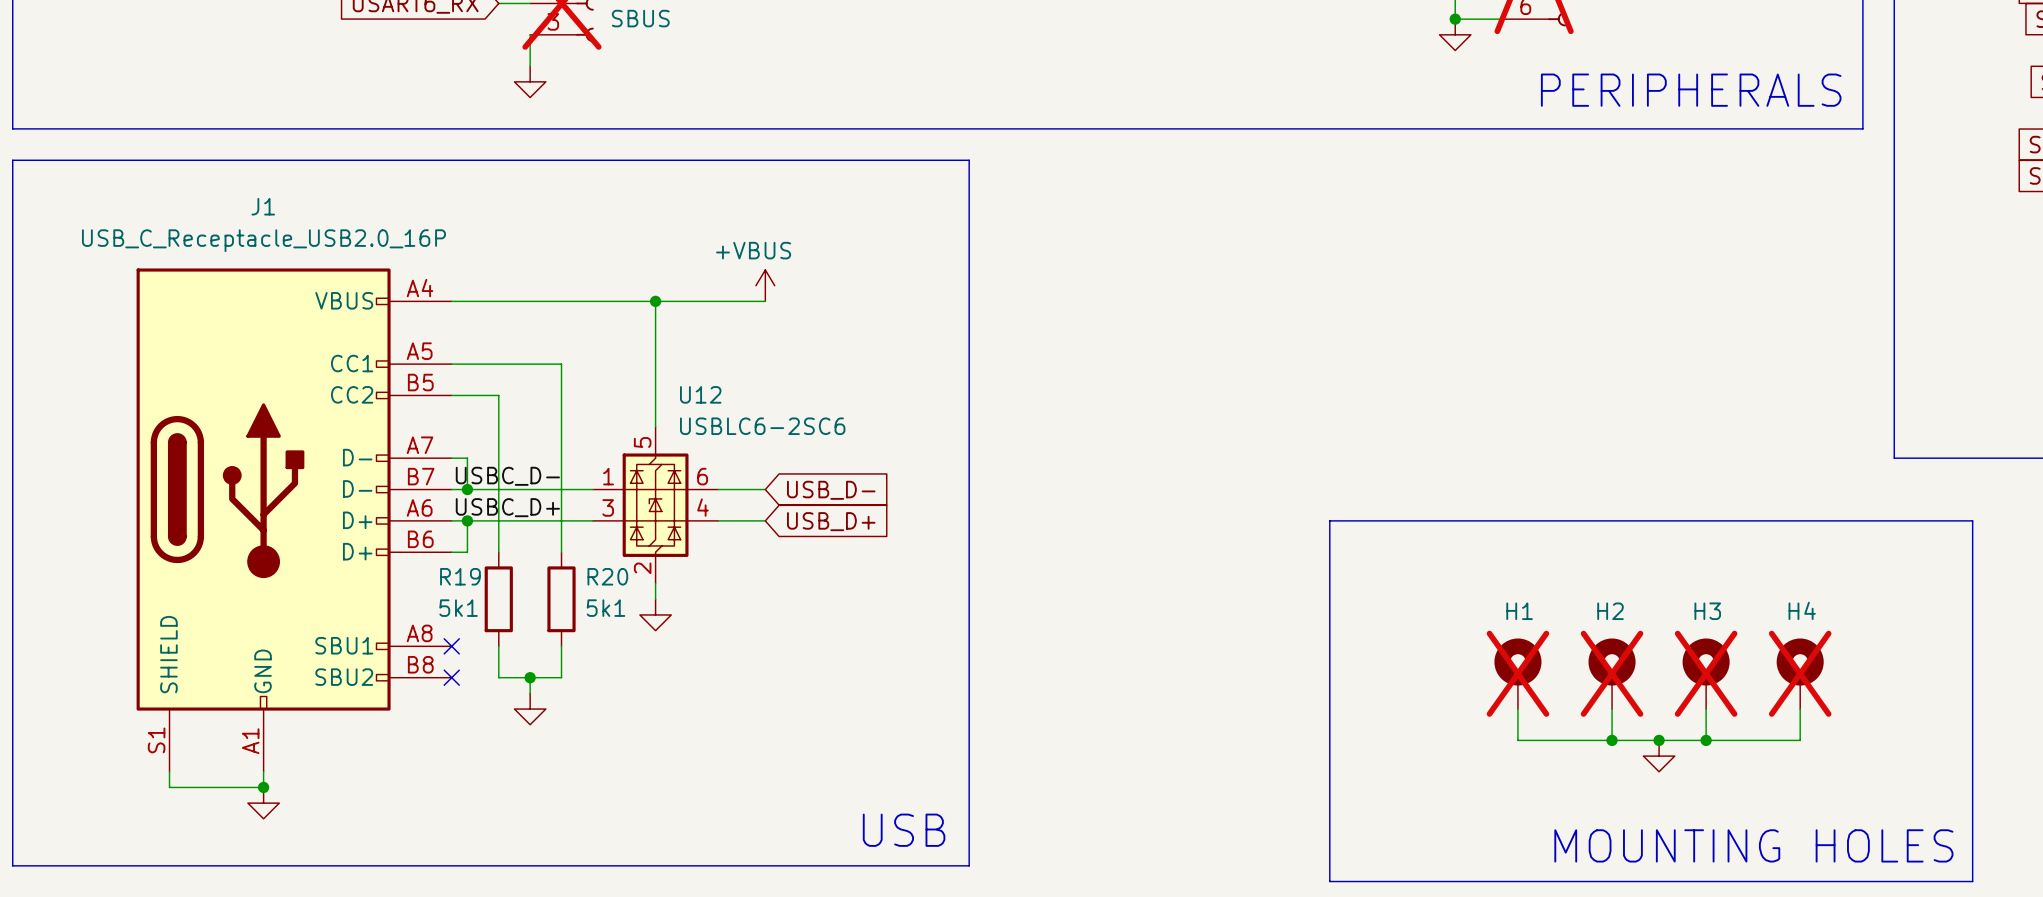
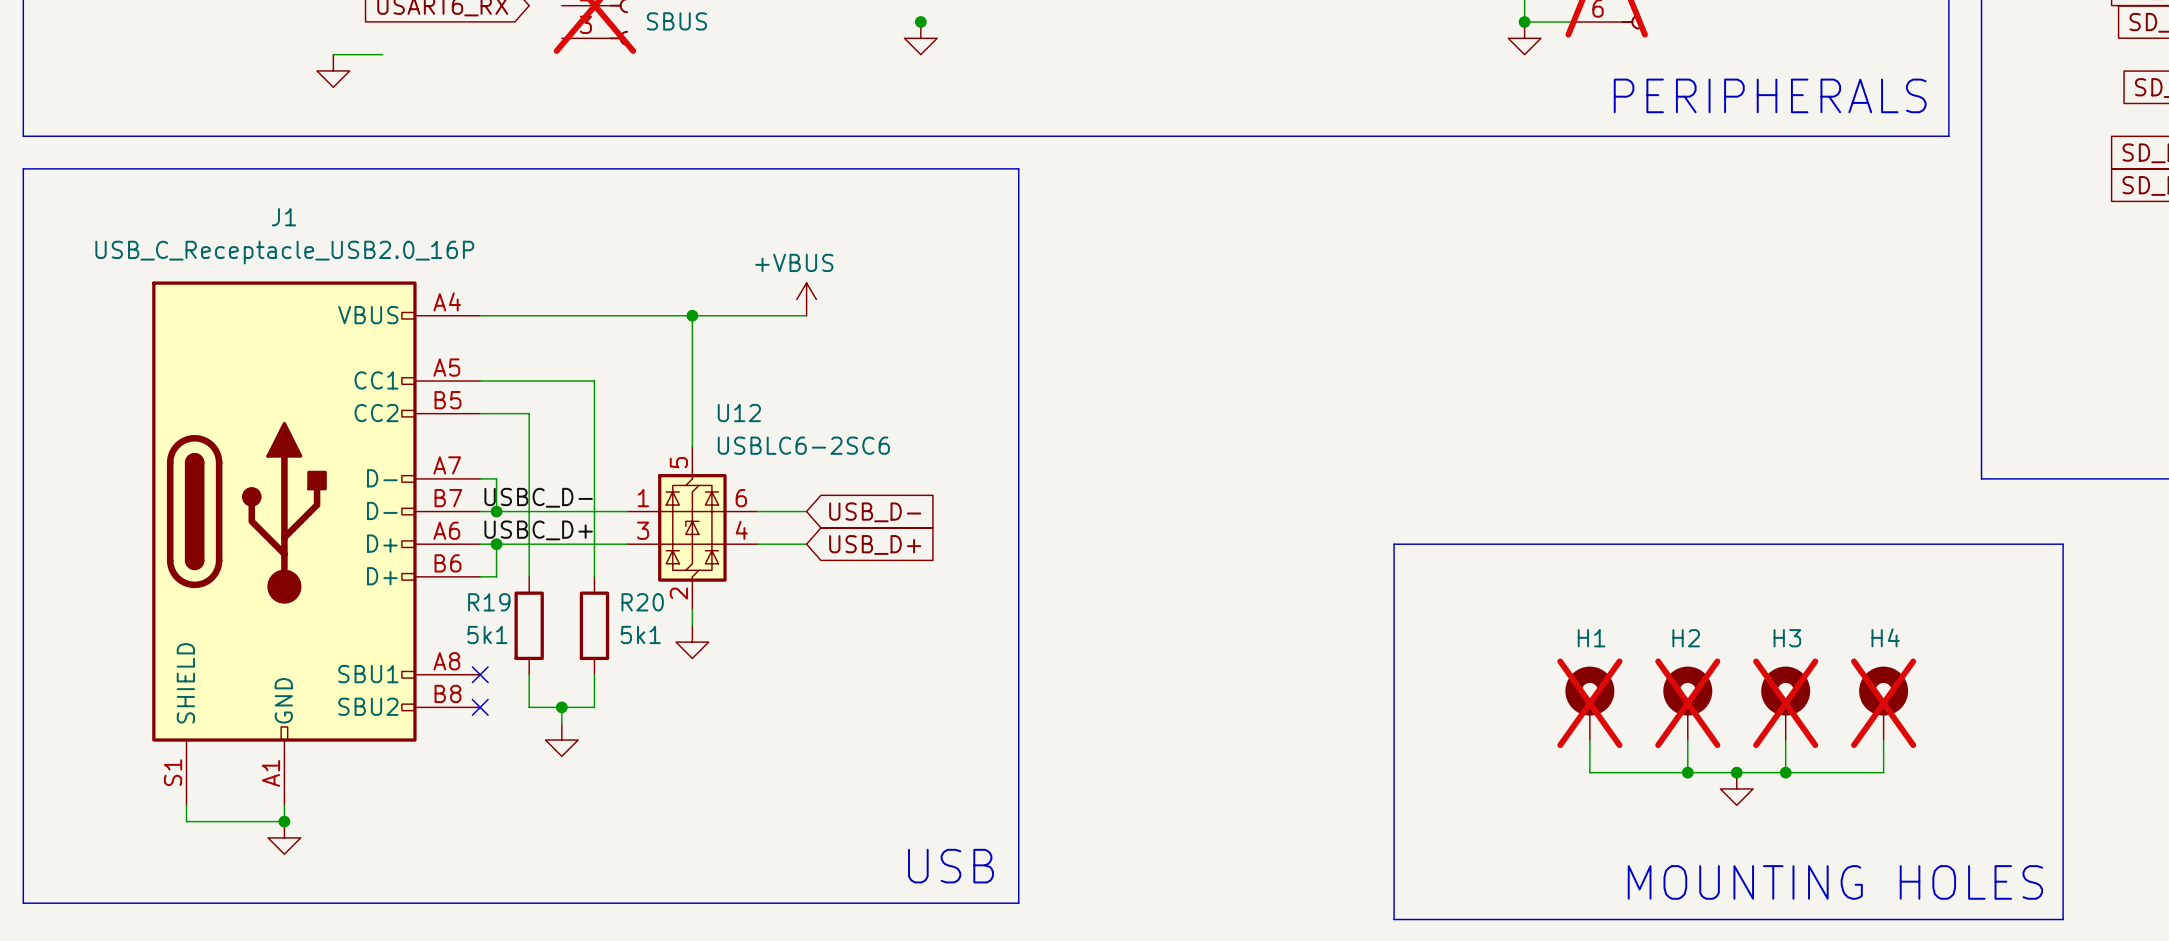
wire: (498, 3) (530, 3) -> none
junction: none -> (920, 22)
wire: (530, 34) (530, 66) -> none
power symbol: none -> (920, 38)
wire: none -> (333, 54) (382, 54)
power symbol: none -> (333, 70)
power symbol: (530, 81) -> none

